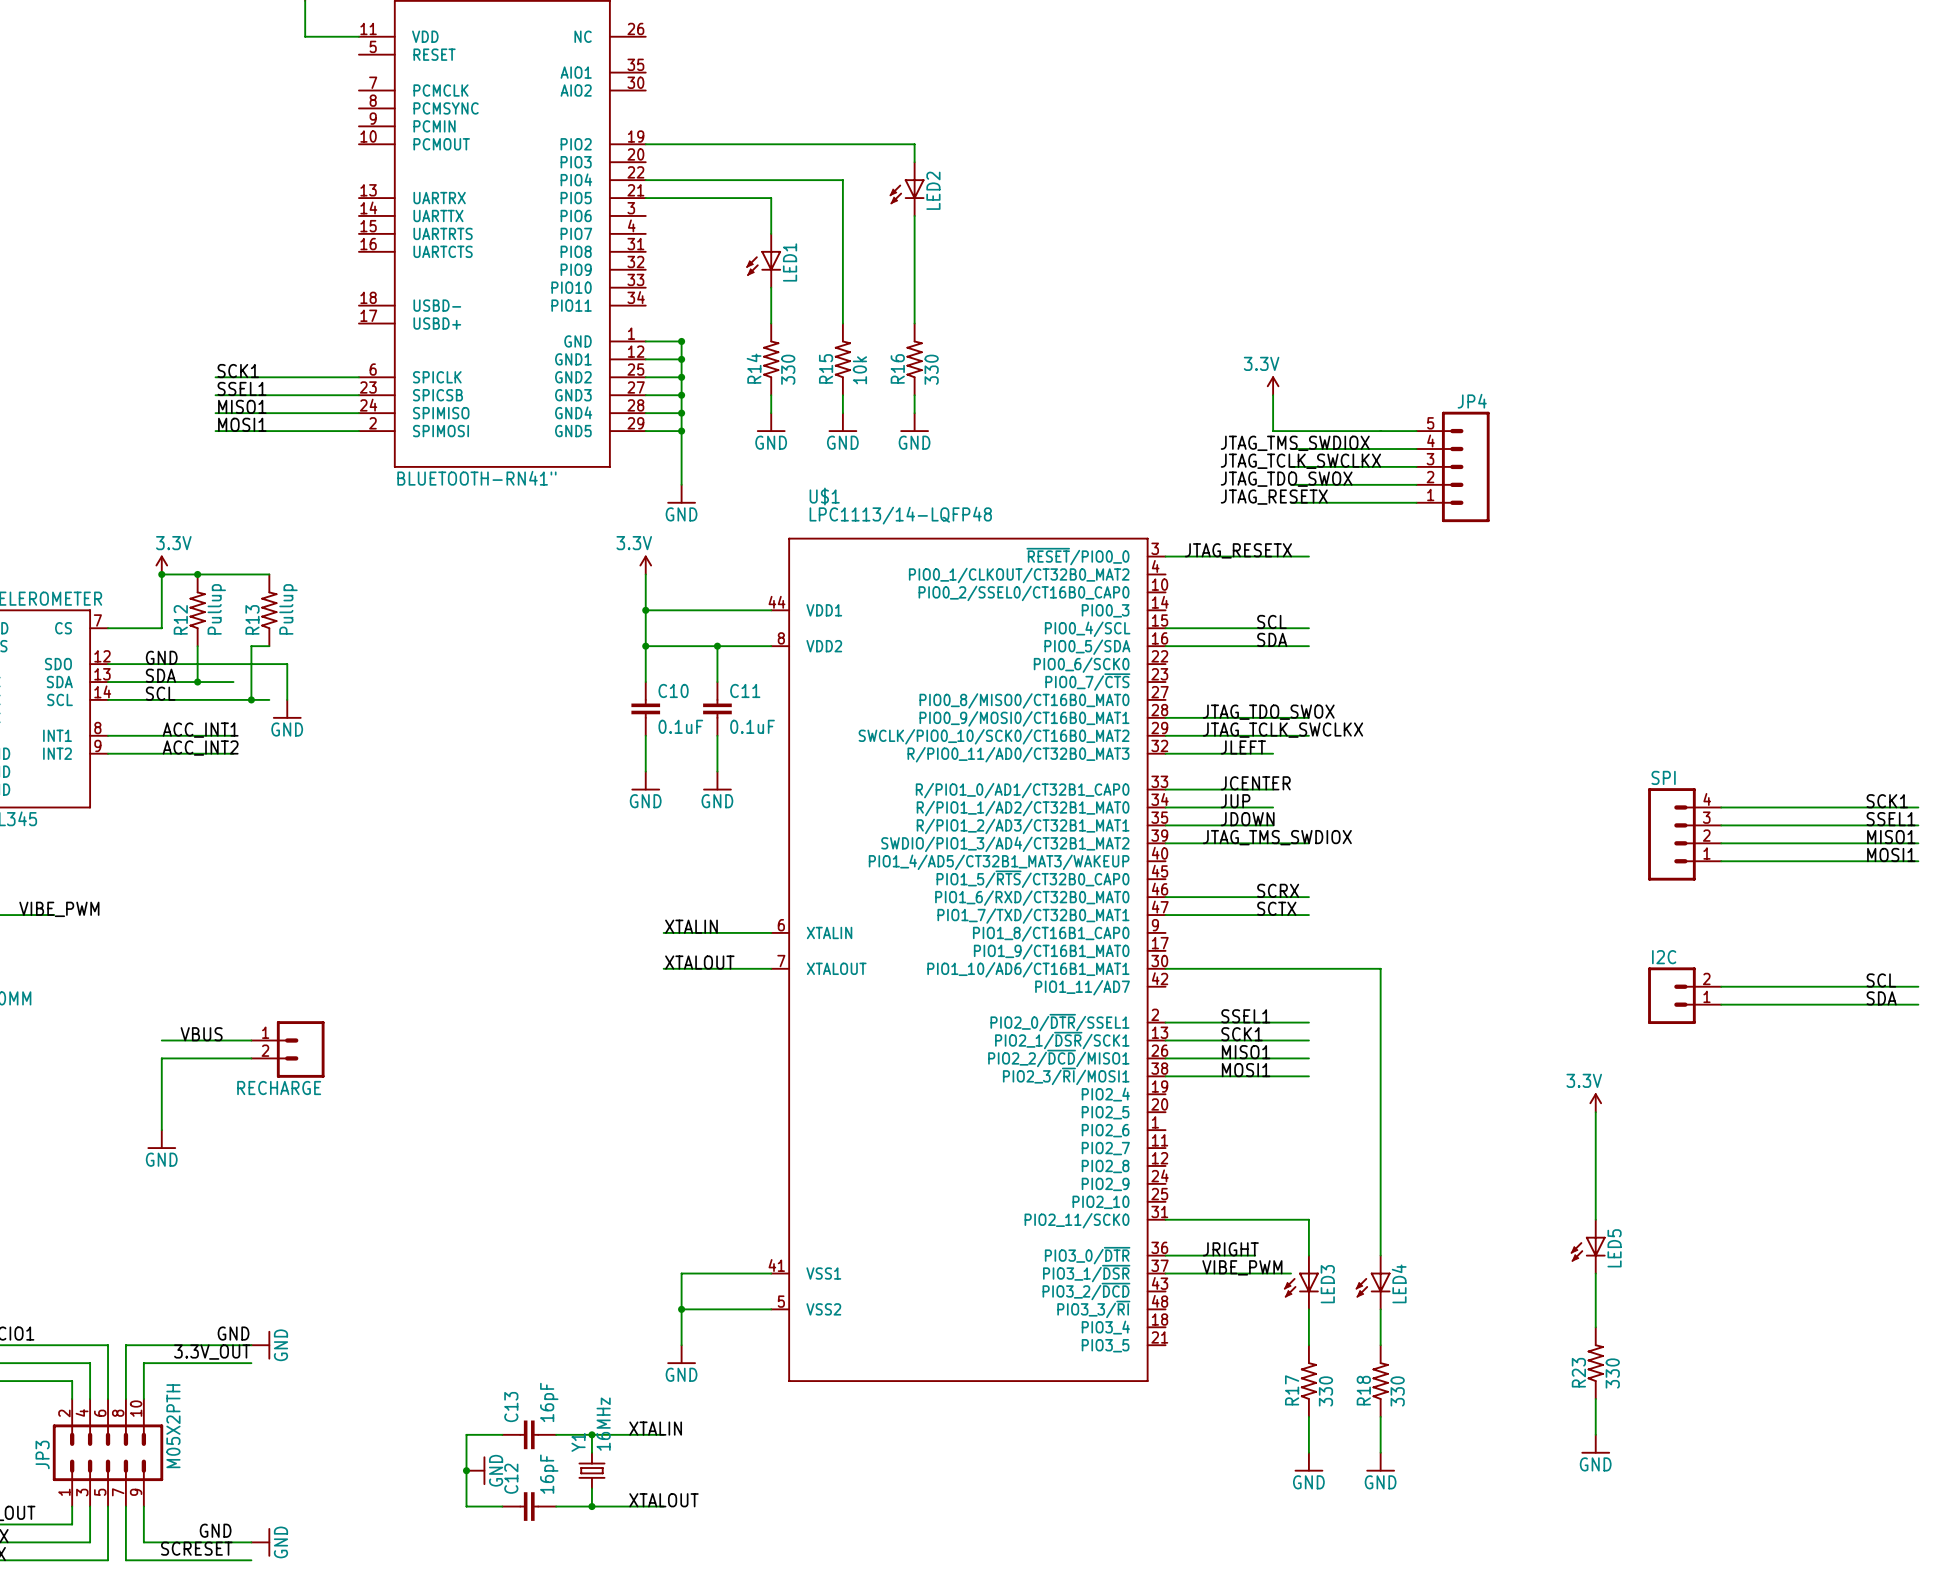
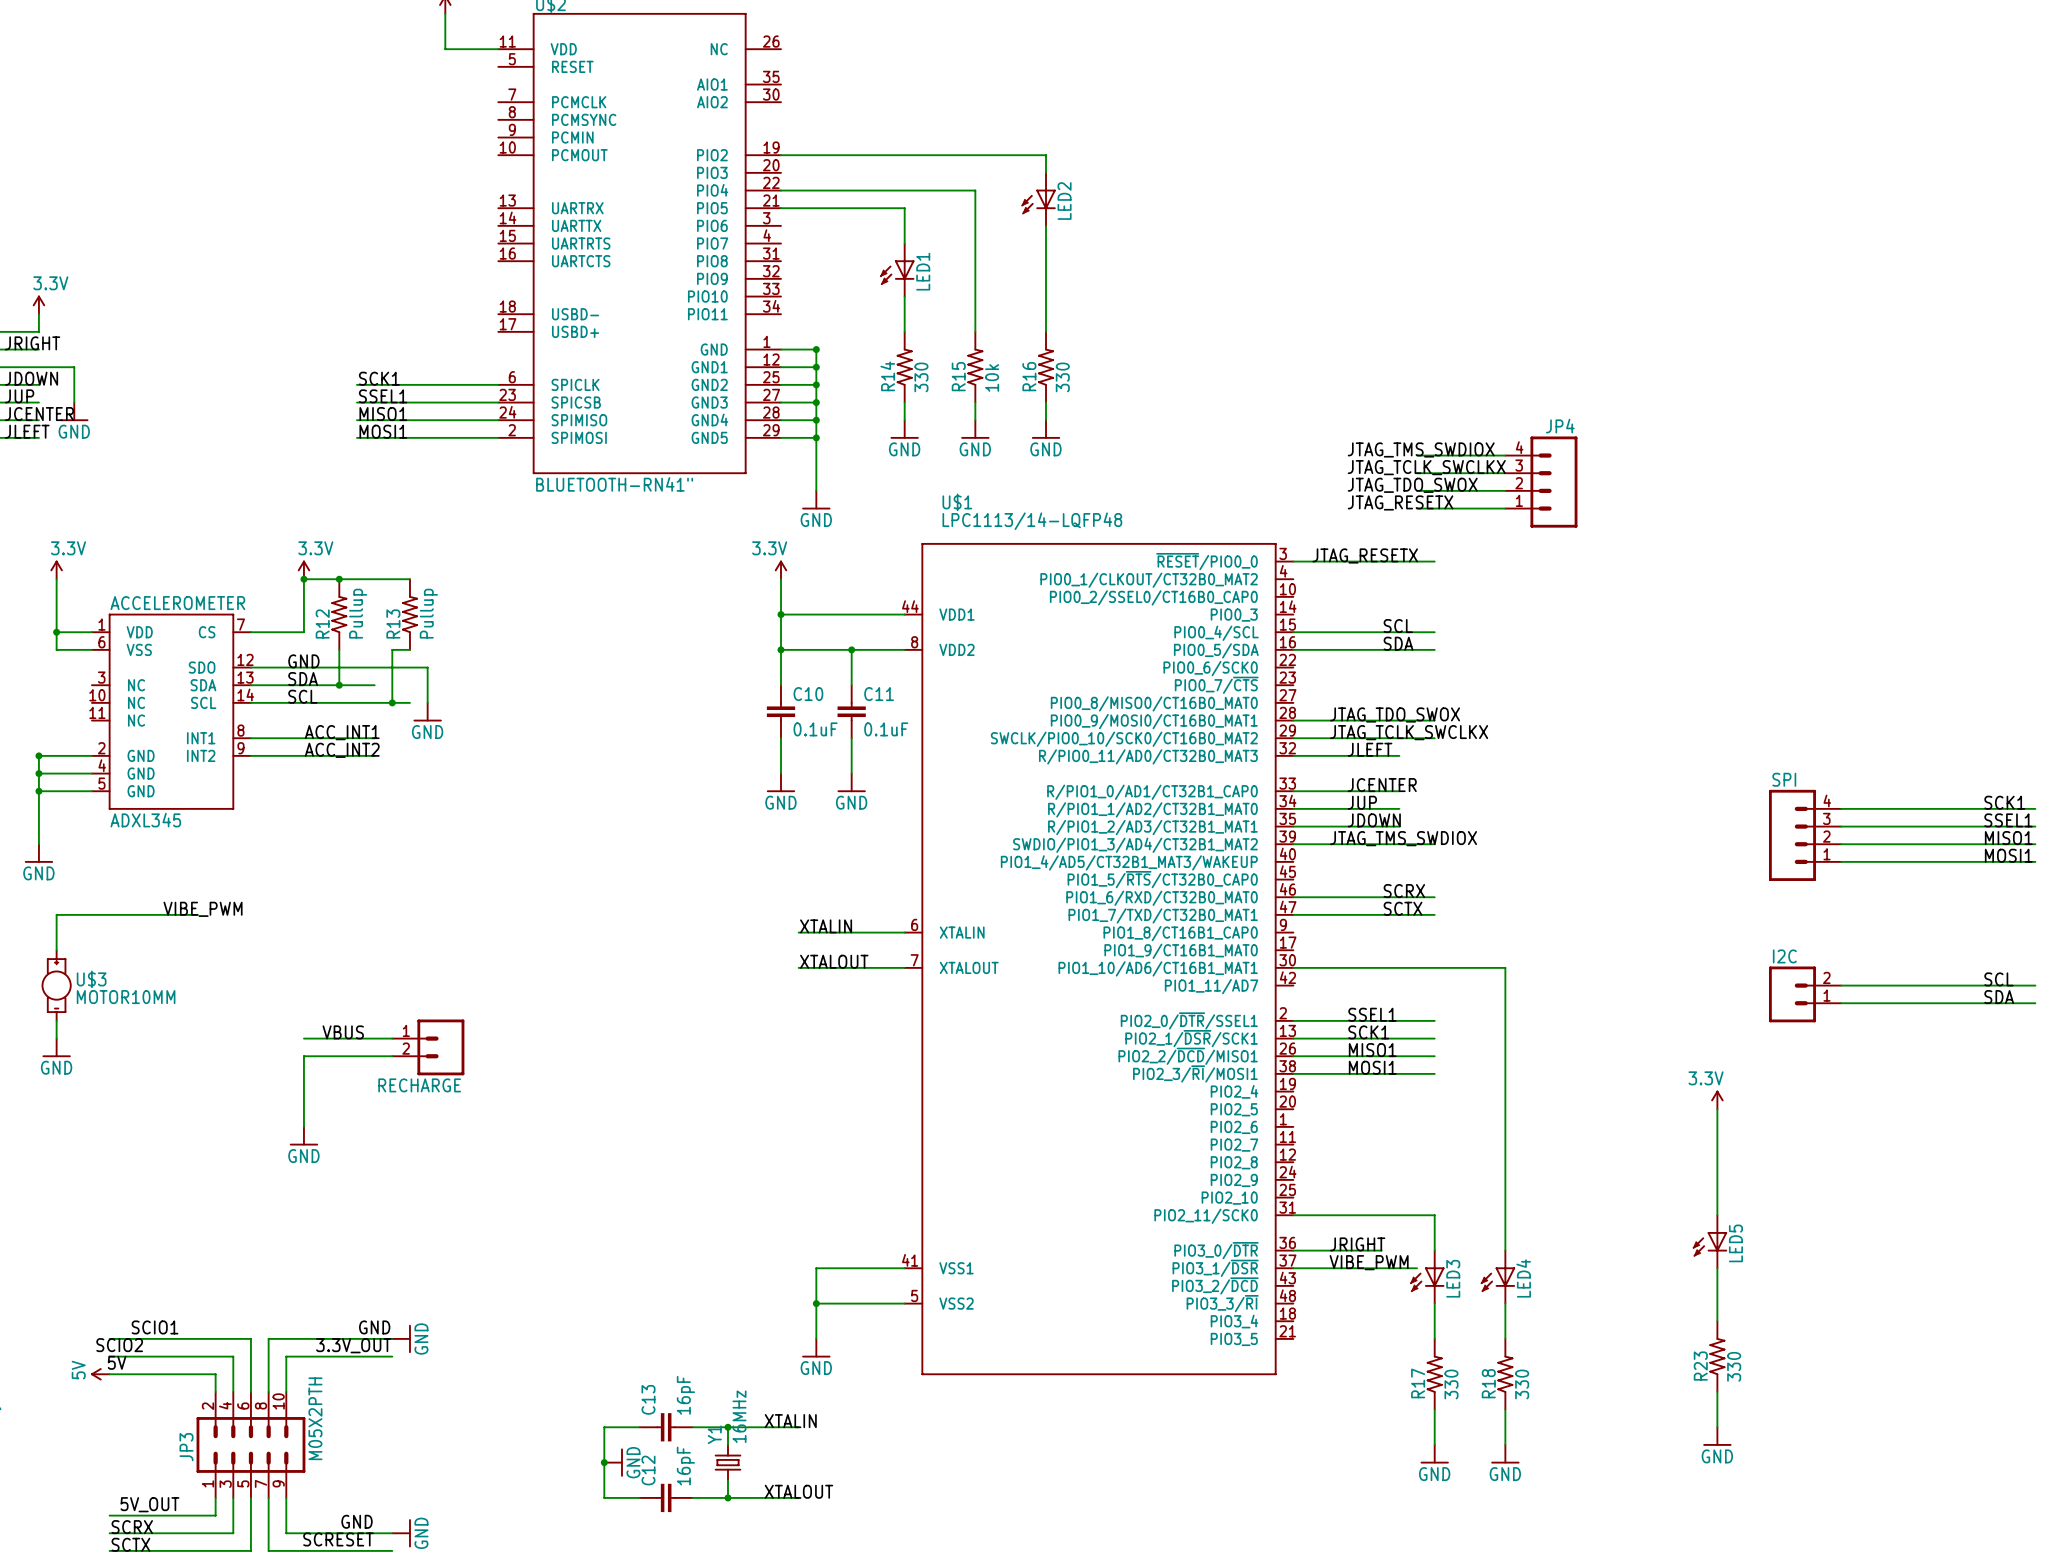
power symbol: 3.3V (1273, 385) -> none
wire: (1273, 395) (1273, 431) (1416, 431) -> none
JP4 symbol: [1416, 411, 1490, 523] -> [1505, 436, 1578, 528]

